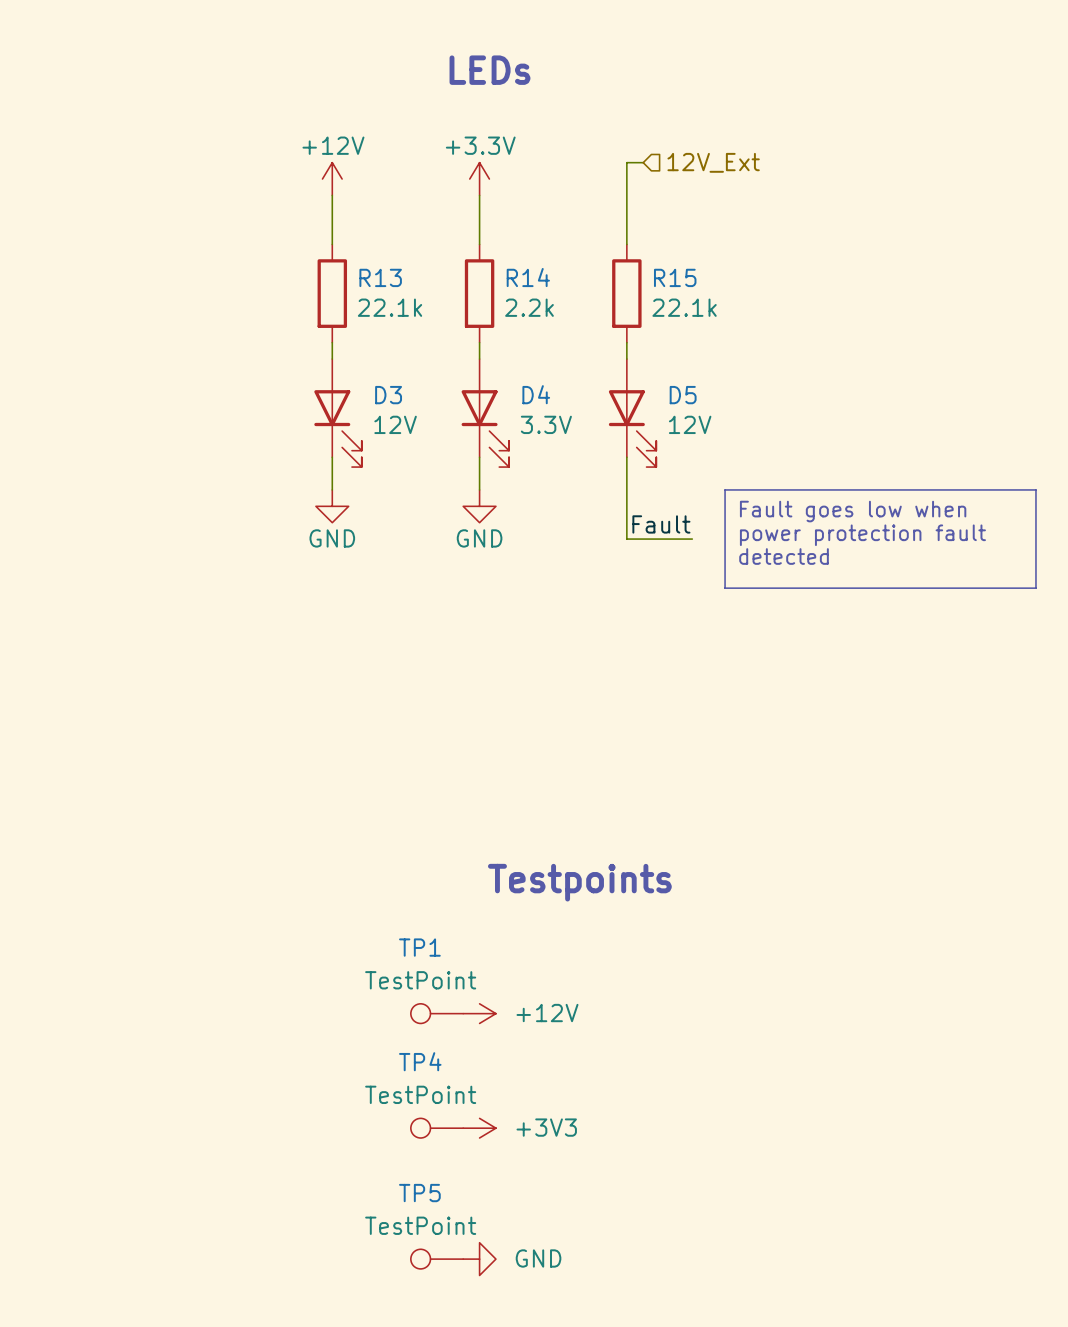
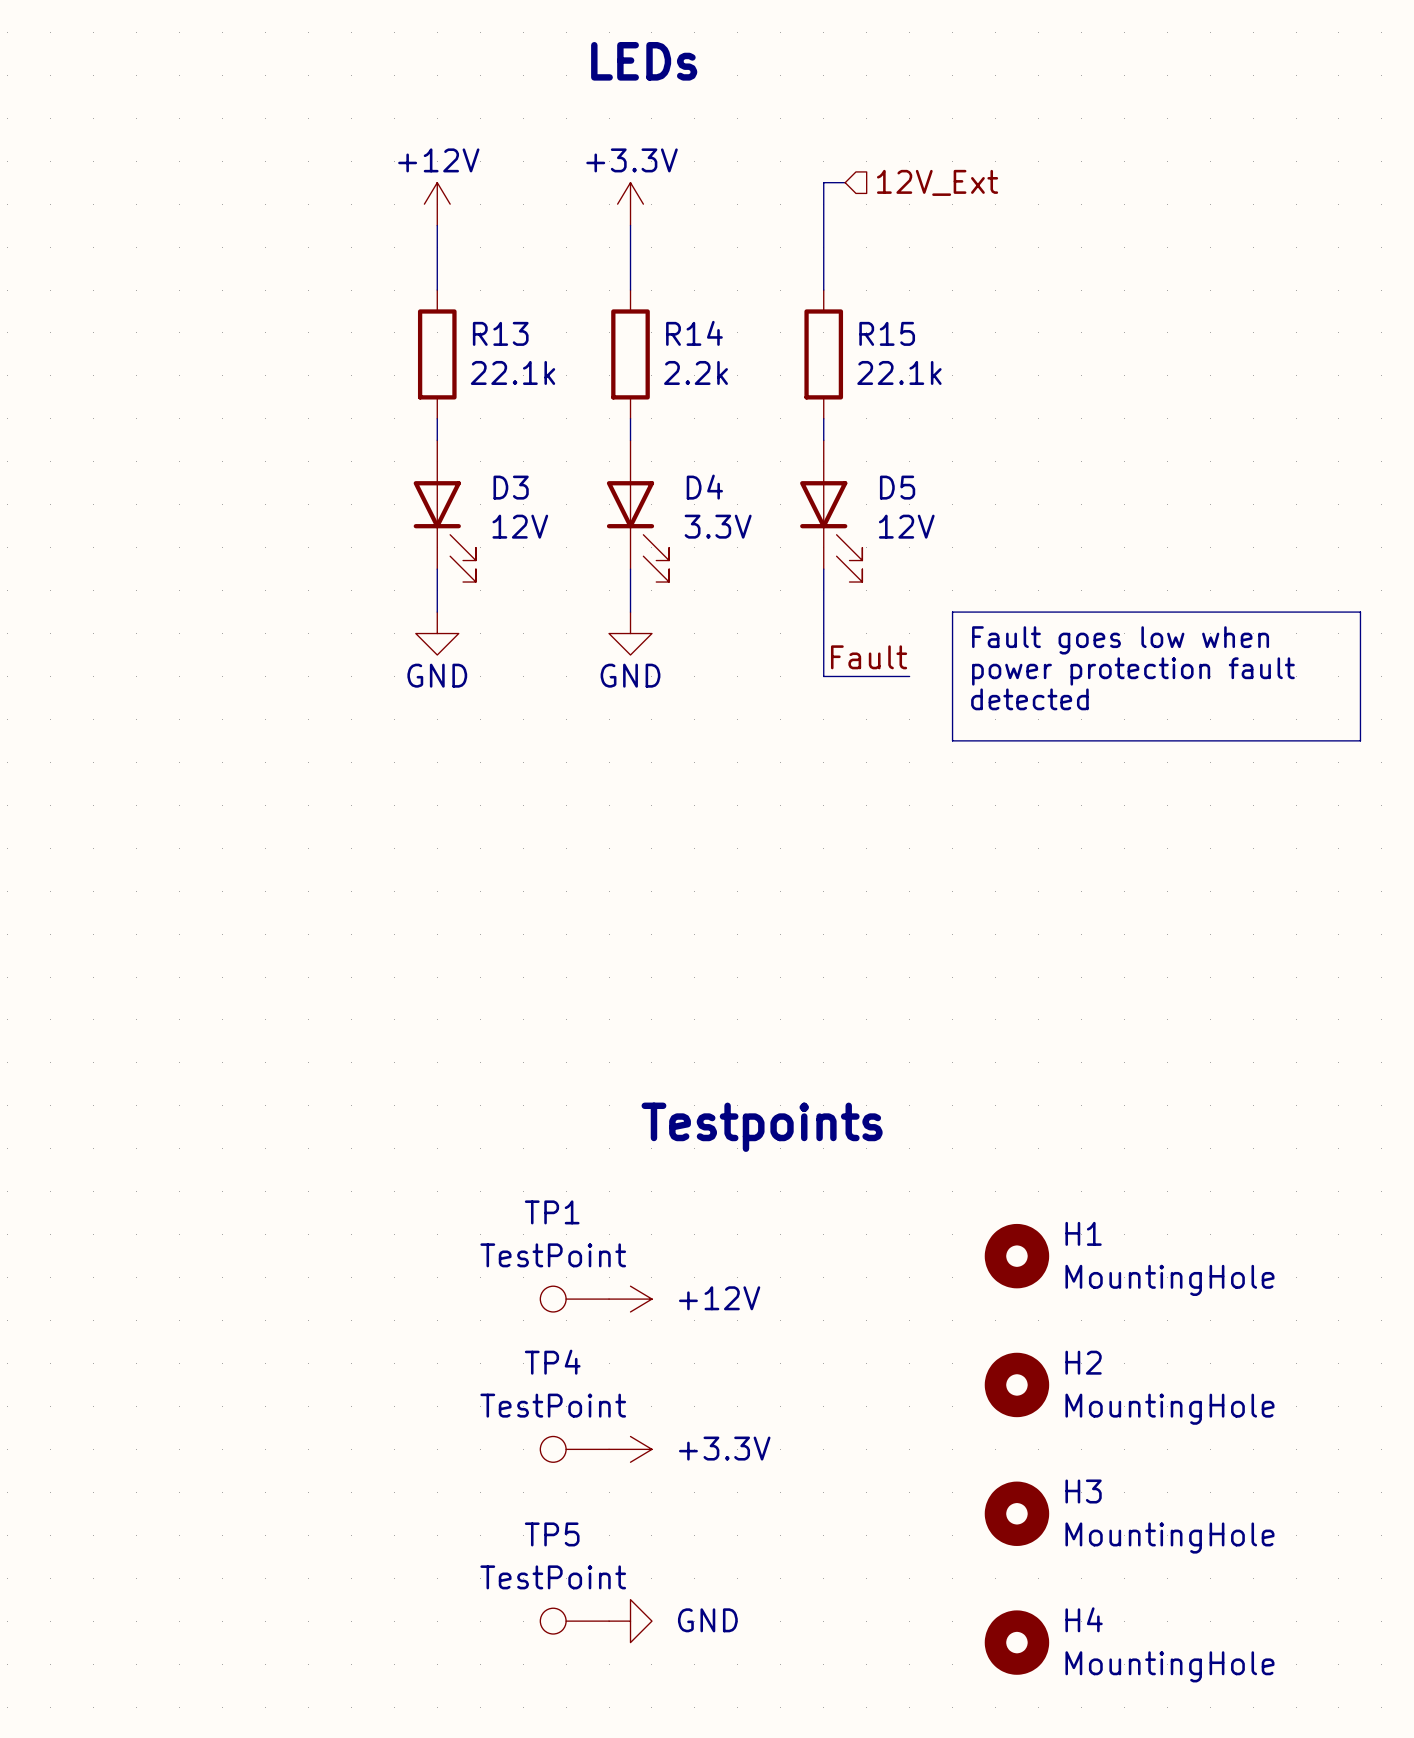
H1: none -> MountingHole (1016, 1256)
H2: none -> MountingHole (1016, 1384)
power symbol: +3V3 (479, 1128) -> +3.3V (630, 1449)
H3: none -> MountingHole (1016, 1513)
H4: none -> MountingHole (1016, 1642)

